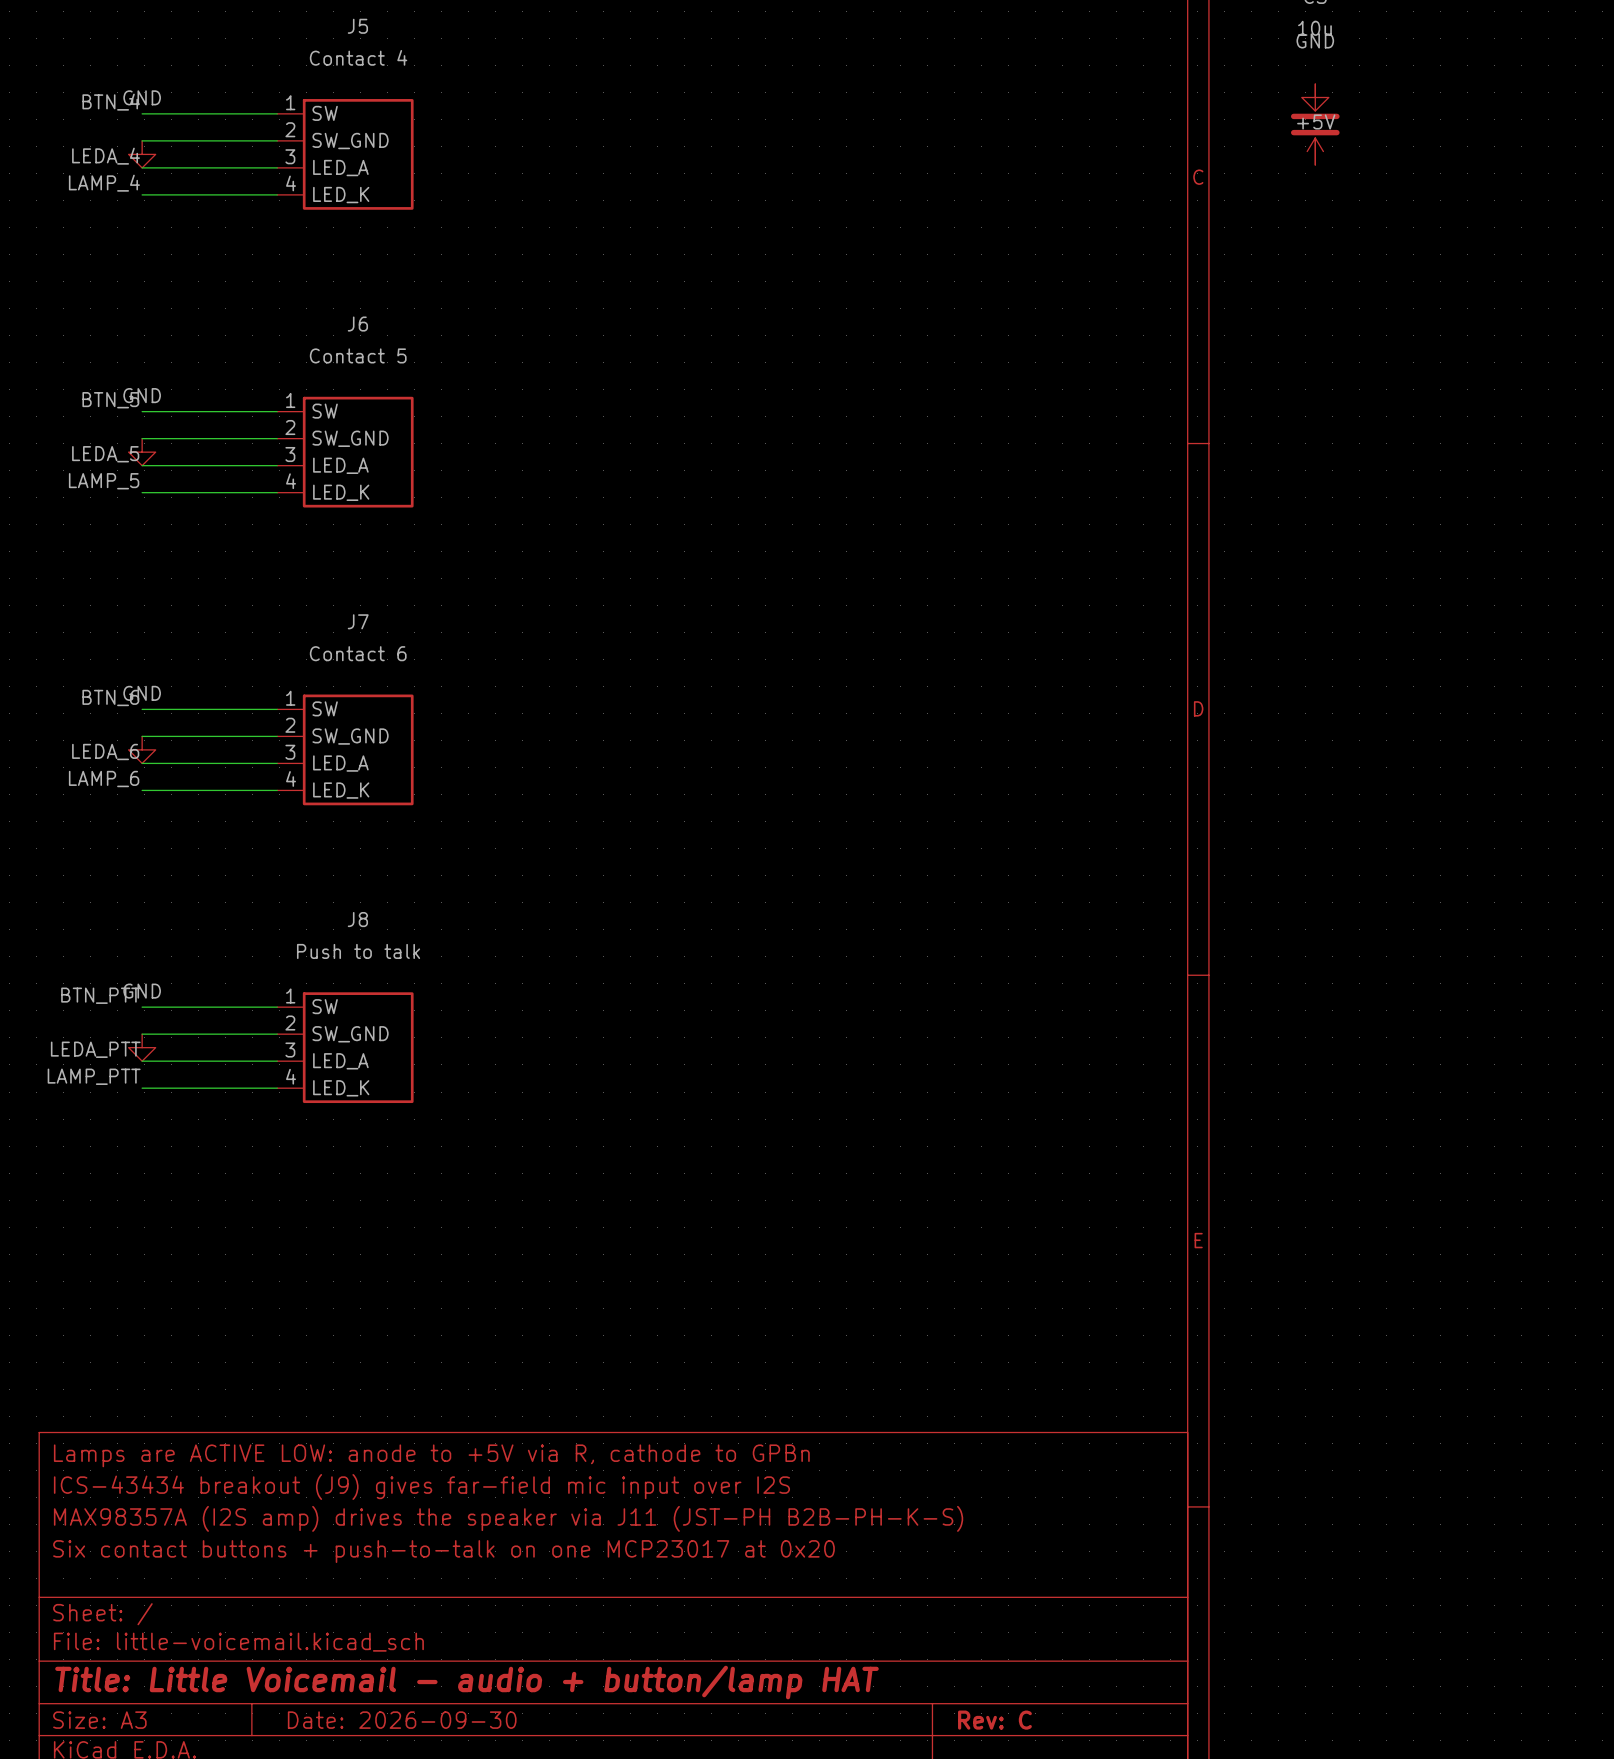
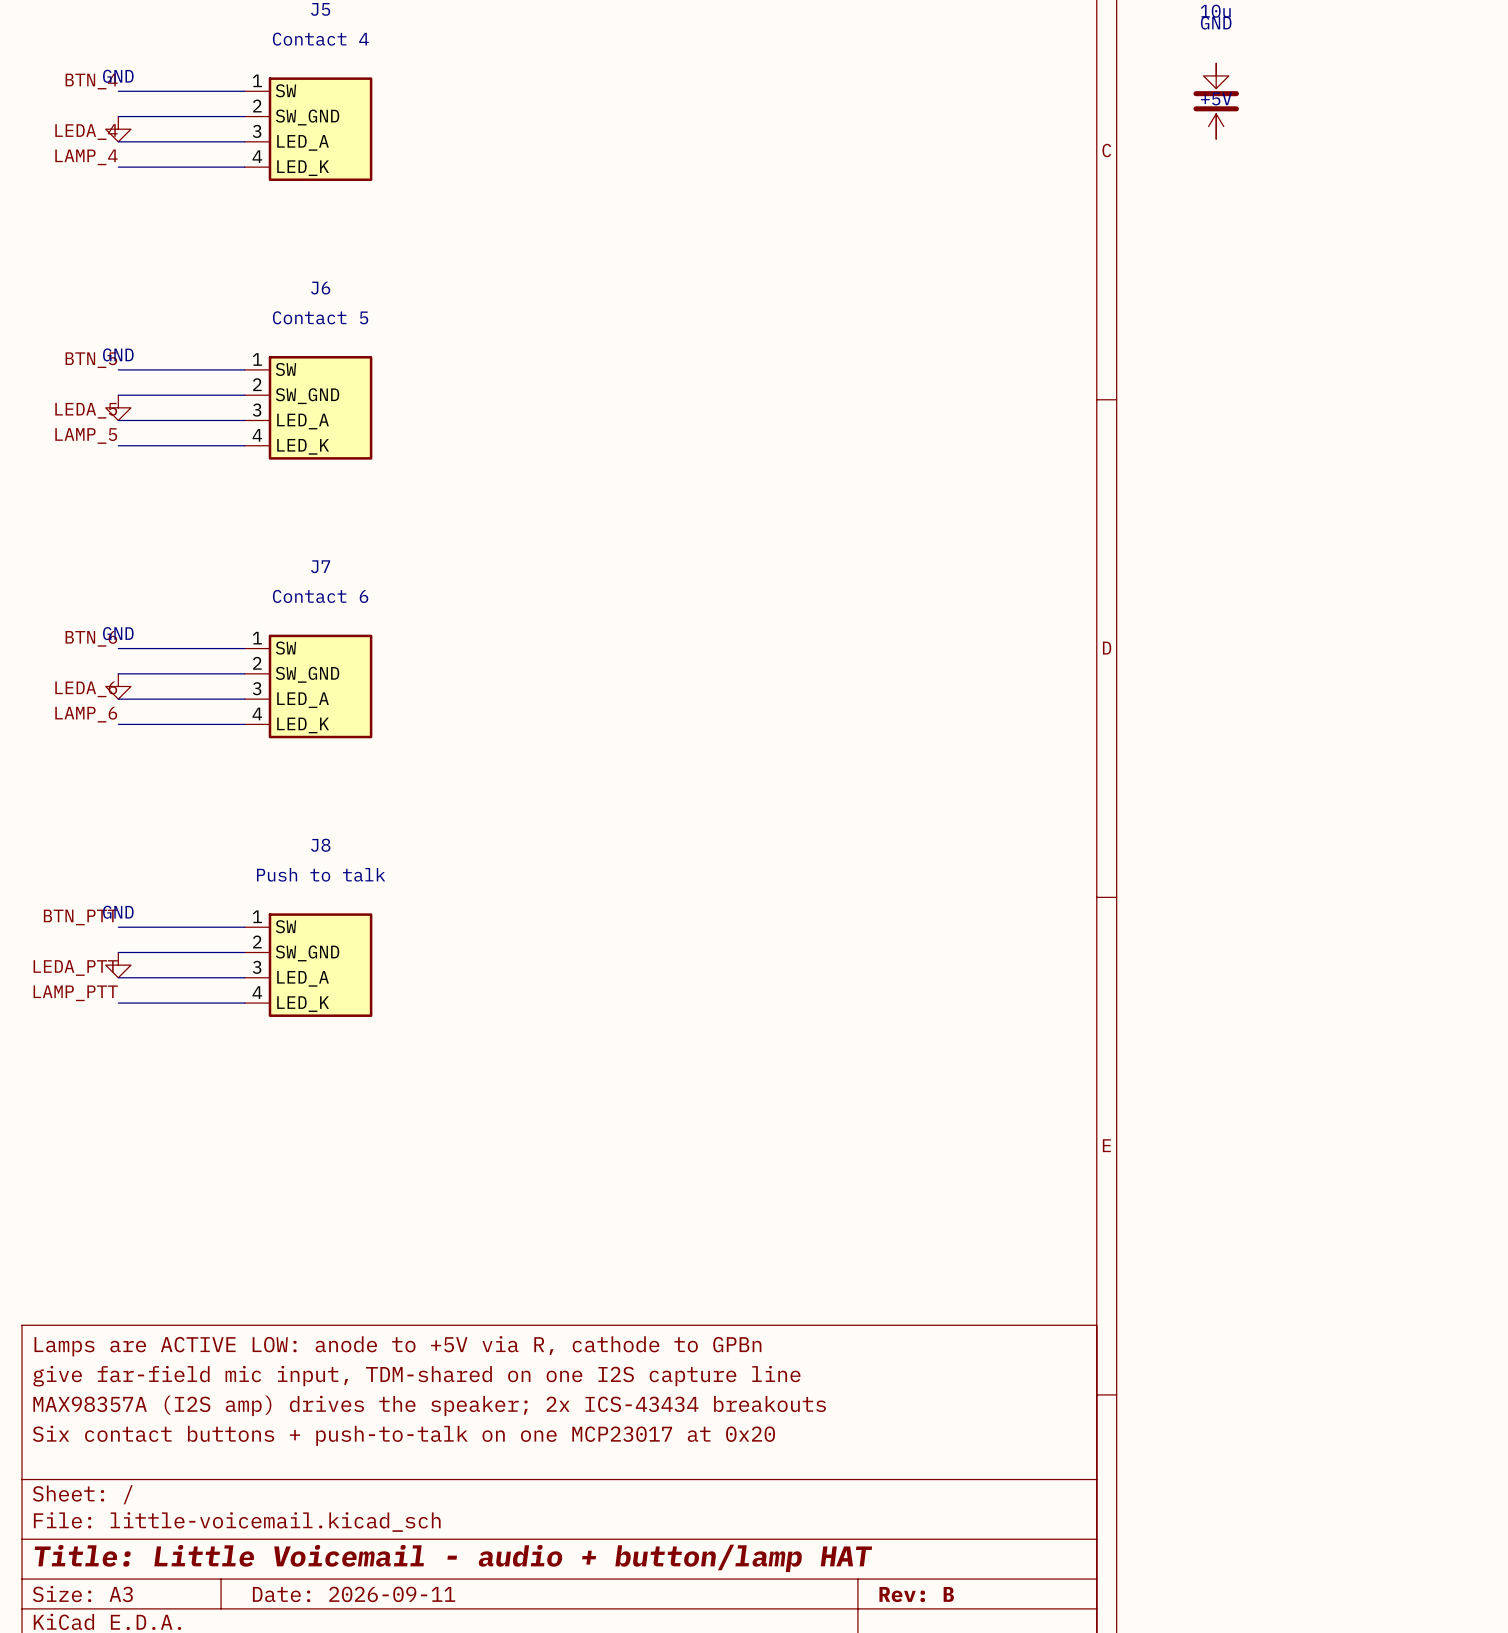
title block: ICS-43434 breakout (J9) gives far-field mic input over I2S (421, 1486) -> give far-field mic input, TDM-shared on one I2S capture line (416, 1376)
title block: MAX98357A (I2S amp) drives the speaker via J11 (JST-PH B2B-PH-K-S) (508, 1518) -> MAX98357A (I2S amp) drives the speaker; 2x ICS-43434 breakouts (429, 1405)
title block: Date: 2026-09-30 (402, 1720) -> Date: 2026-09-11 (354, 1594)
title block: Rev: C (994, 1720) -> Rev: B (916, 1594)

